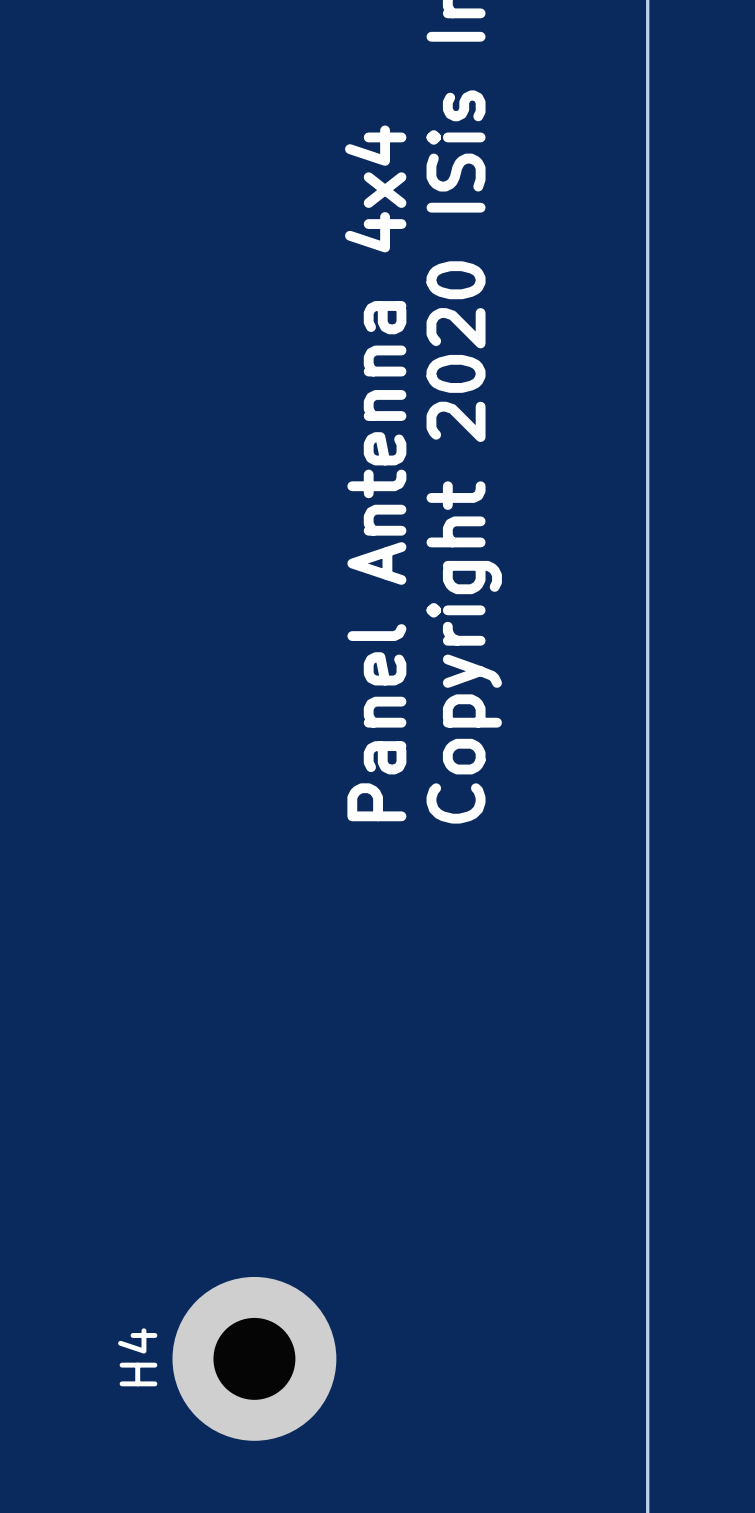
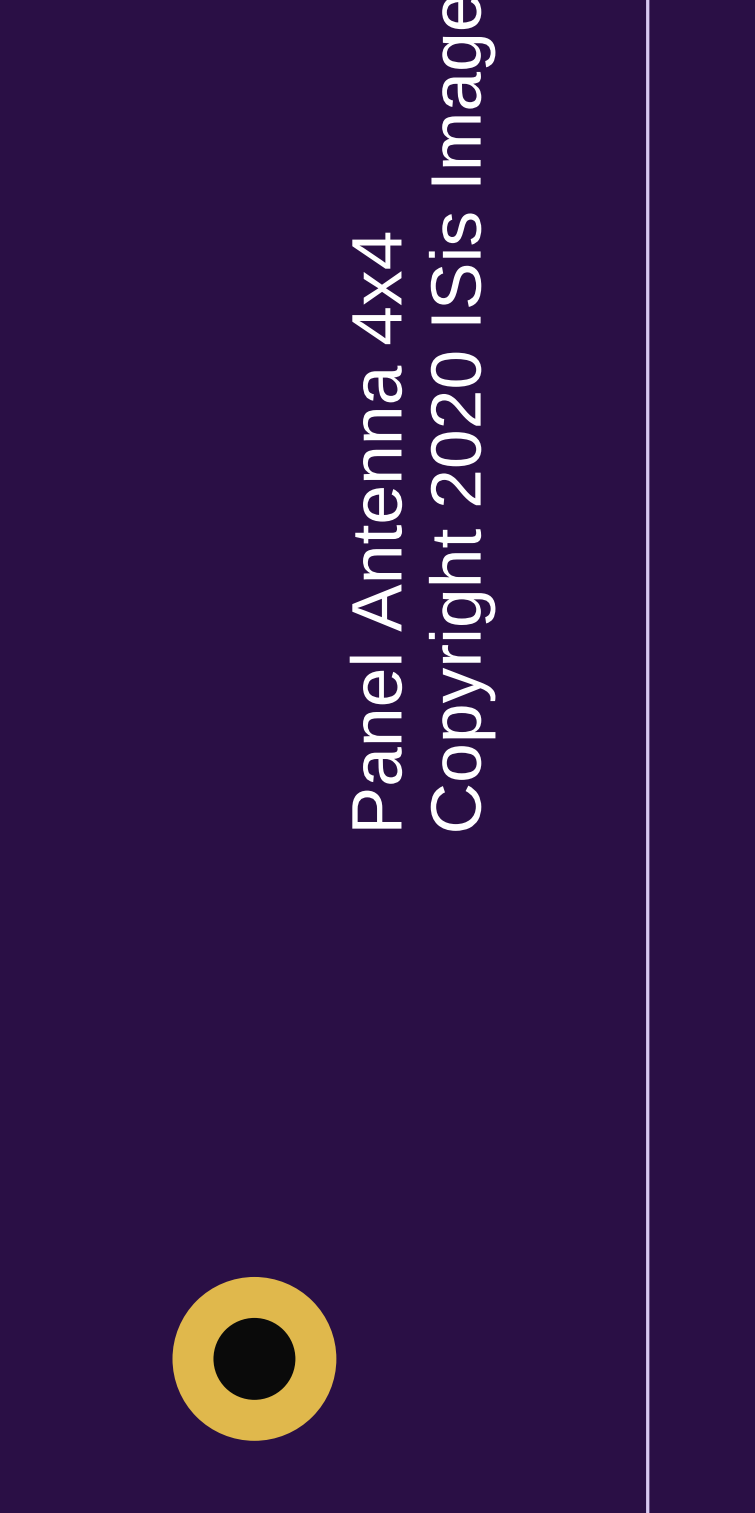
H4 name: H4 (137, 1357) -> none

